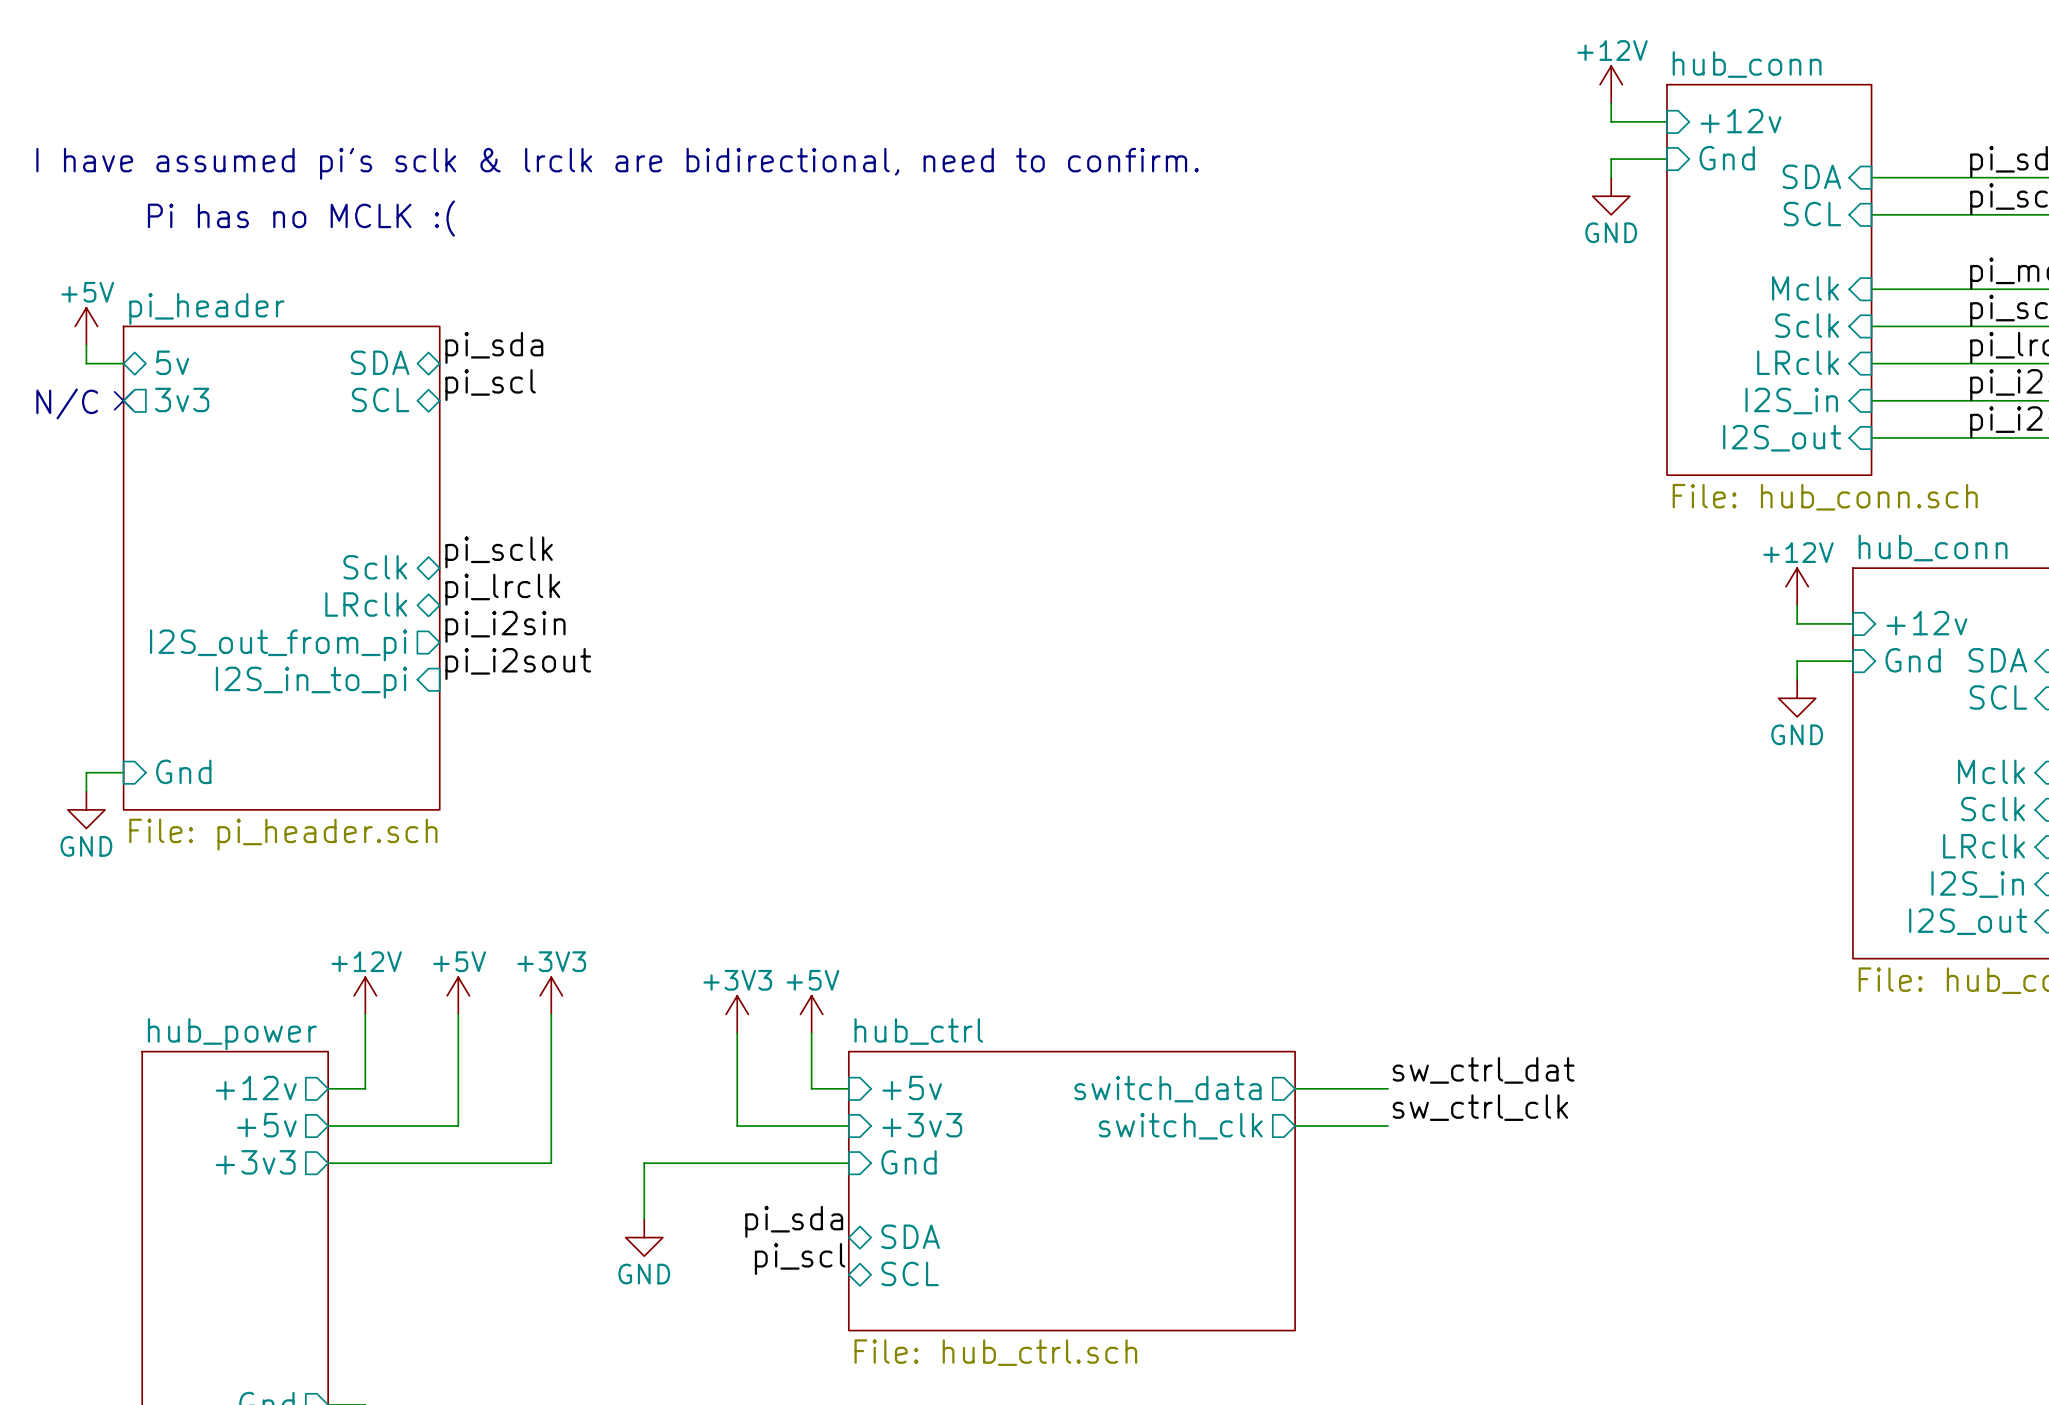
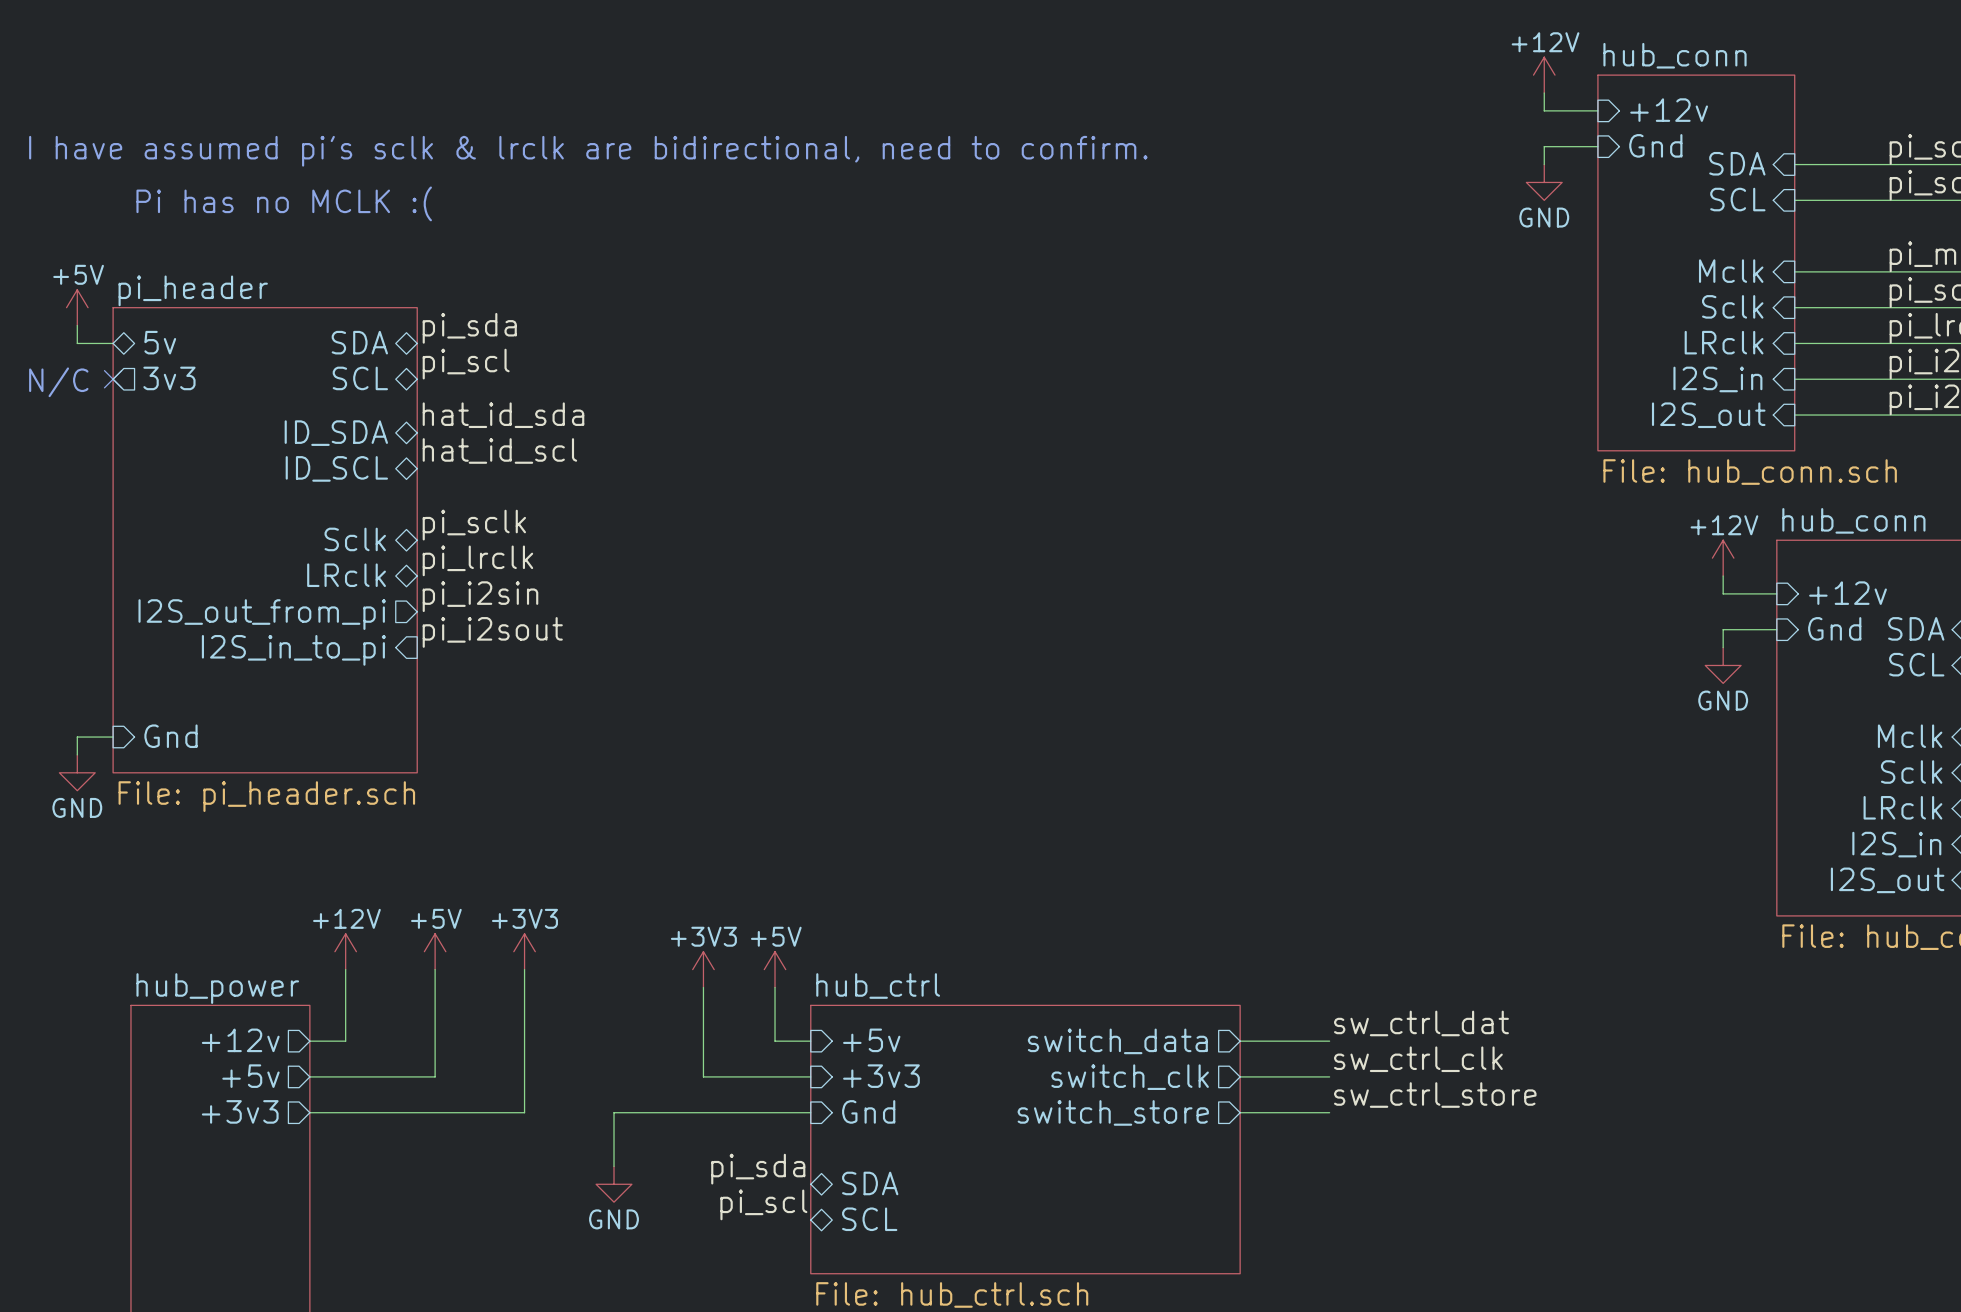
label: none -> hat_id_sda (503, 415)
sheet pin: none -> ID_SDA (336, 433)
label: none -> hat_id_scl (499, 450)
sheet pin: none -> ID_SCL (336, 468)
label: none -> sw_ctrl_store (1435, 1095)
sheet pin: none -> switch_store (1113, 1112)
wire: none -> (1240, 1112) (1329, 1112)

